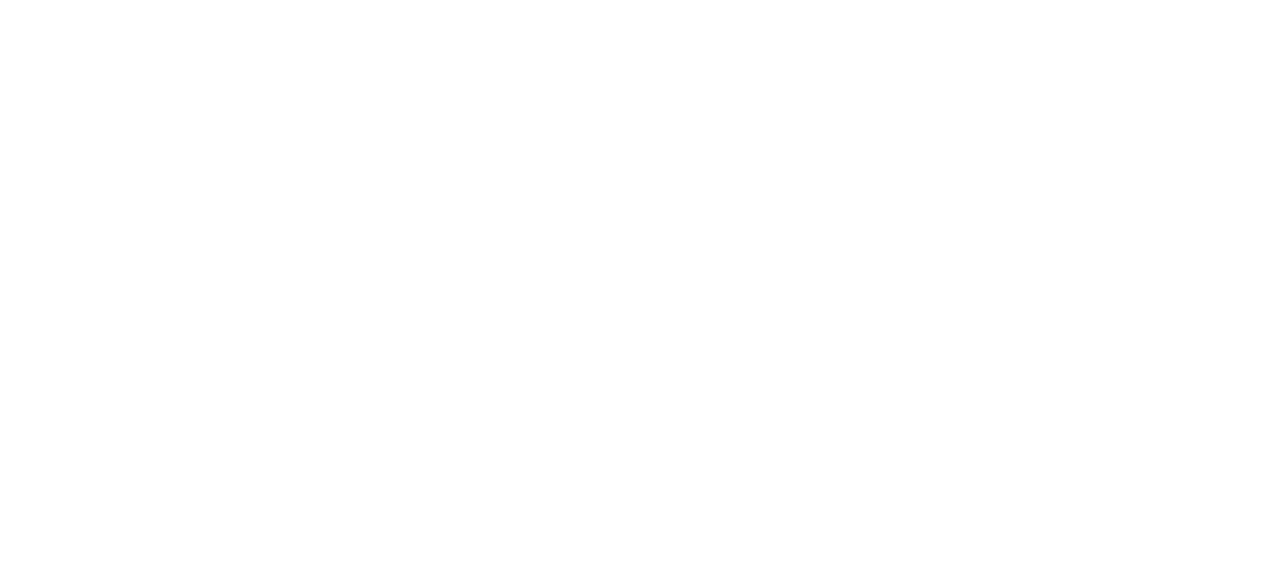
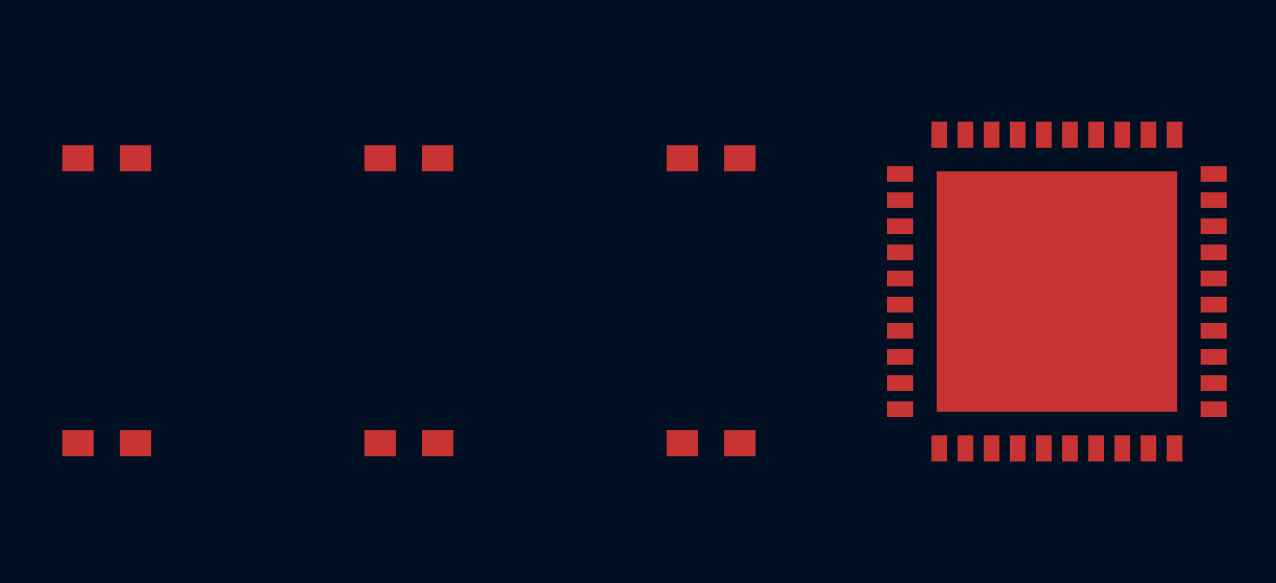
part: none -> (106, 158)
part: none -> (408, 158)
part: none -> (711, 158)
part: none -> (1056, 291)
part: none -> (106, 443)
part: none -> (408, 443)
part: none -> (711, 443)

